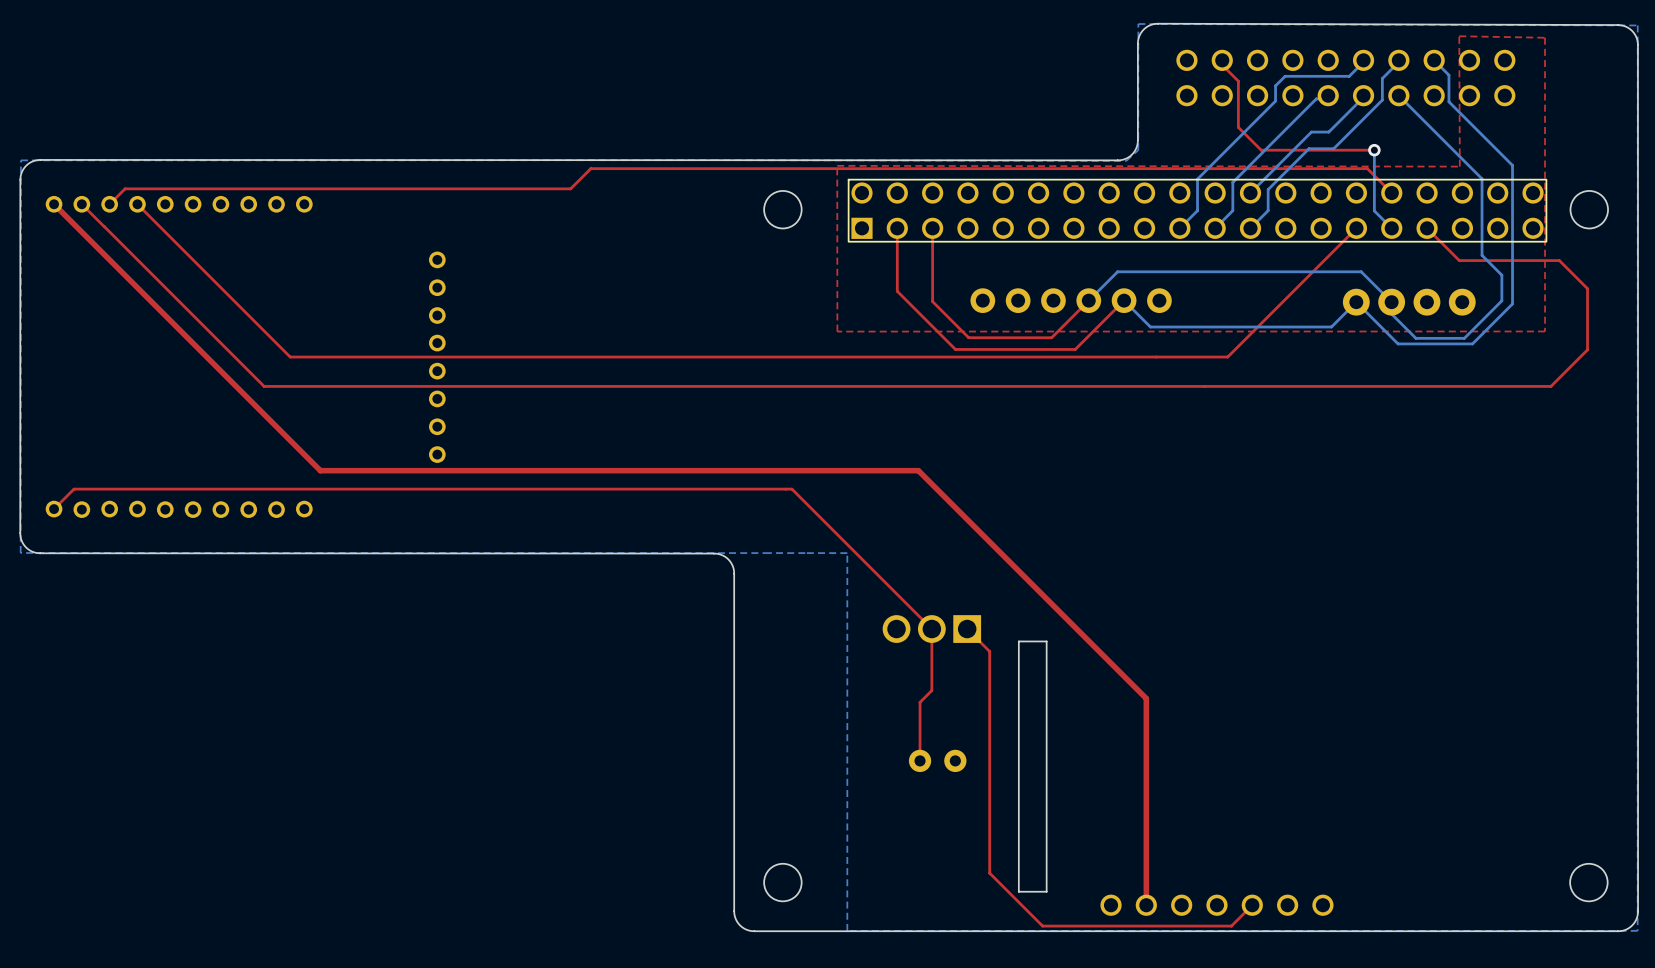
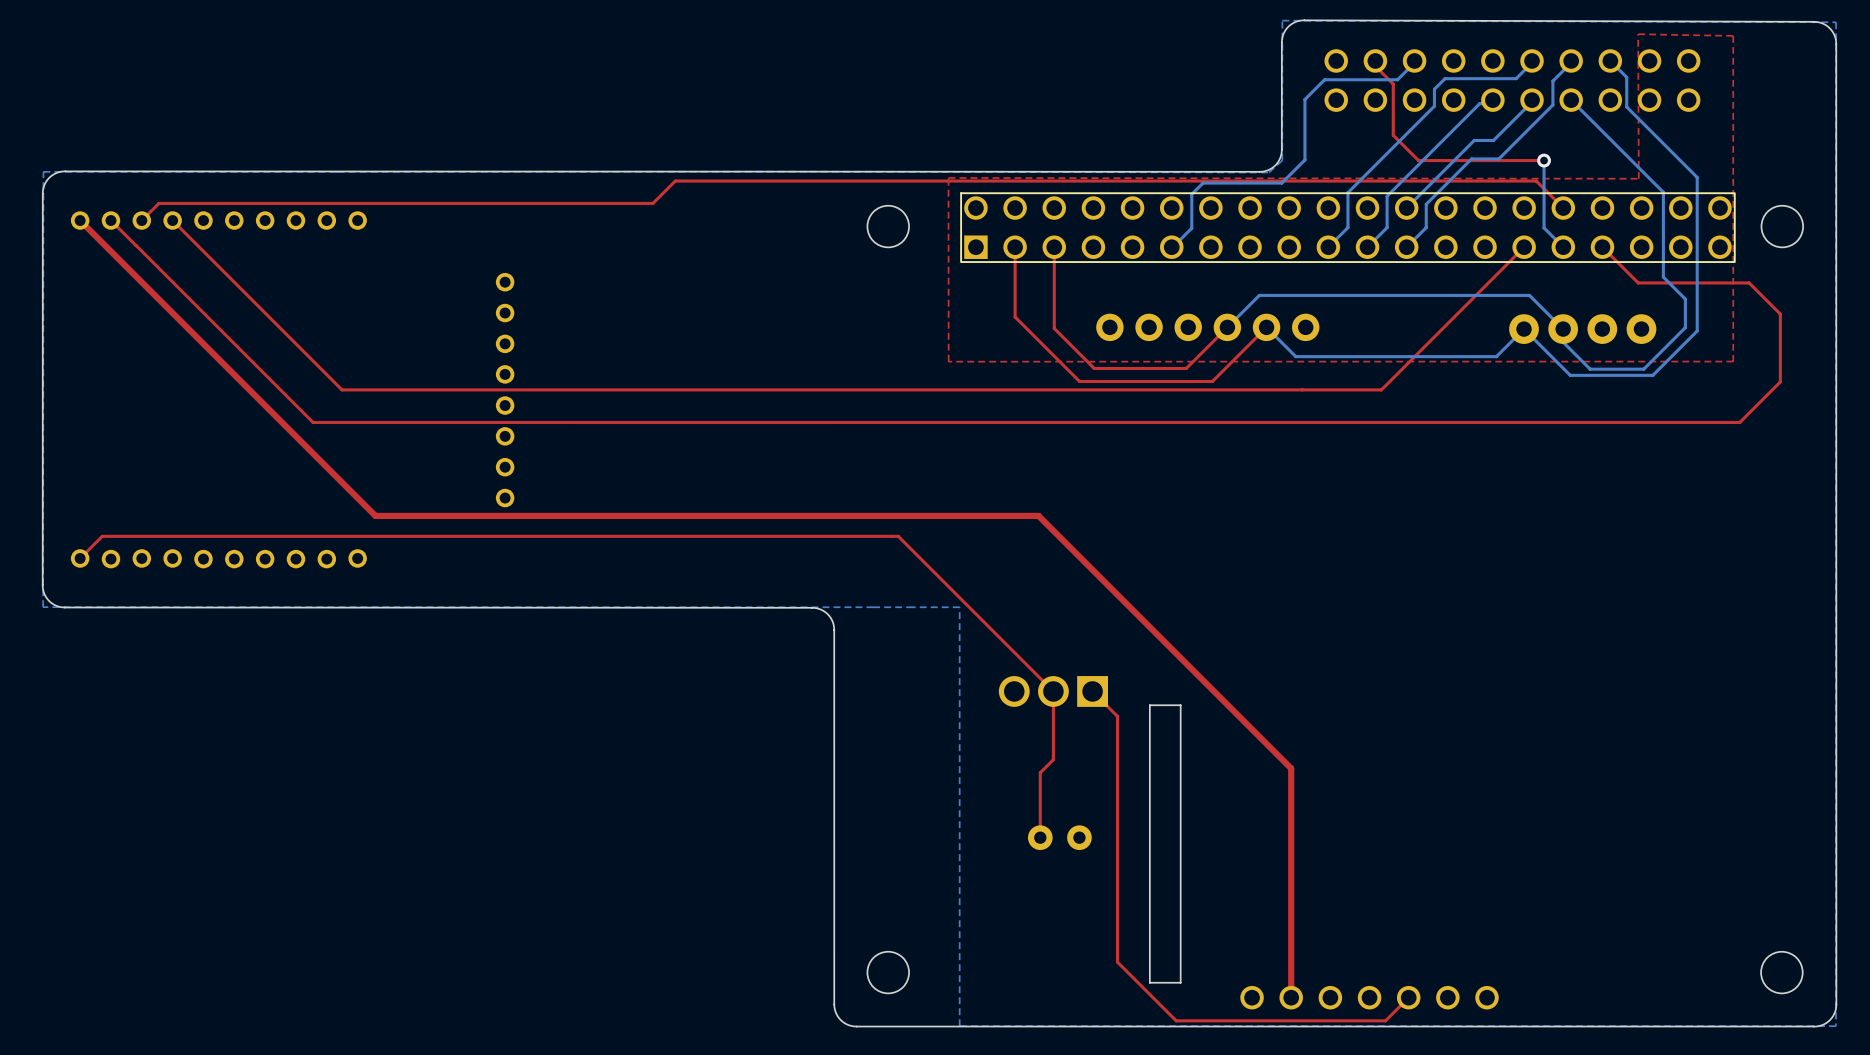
bottom track: none -> (1412, 64) (1397, 79) (1324, 79) (1304, 99) (1304, 159) (1281, 183) (1203, 183) (1191, 194) (1191, 228) (1171, 248) (1171, 237)

